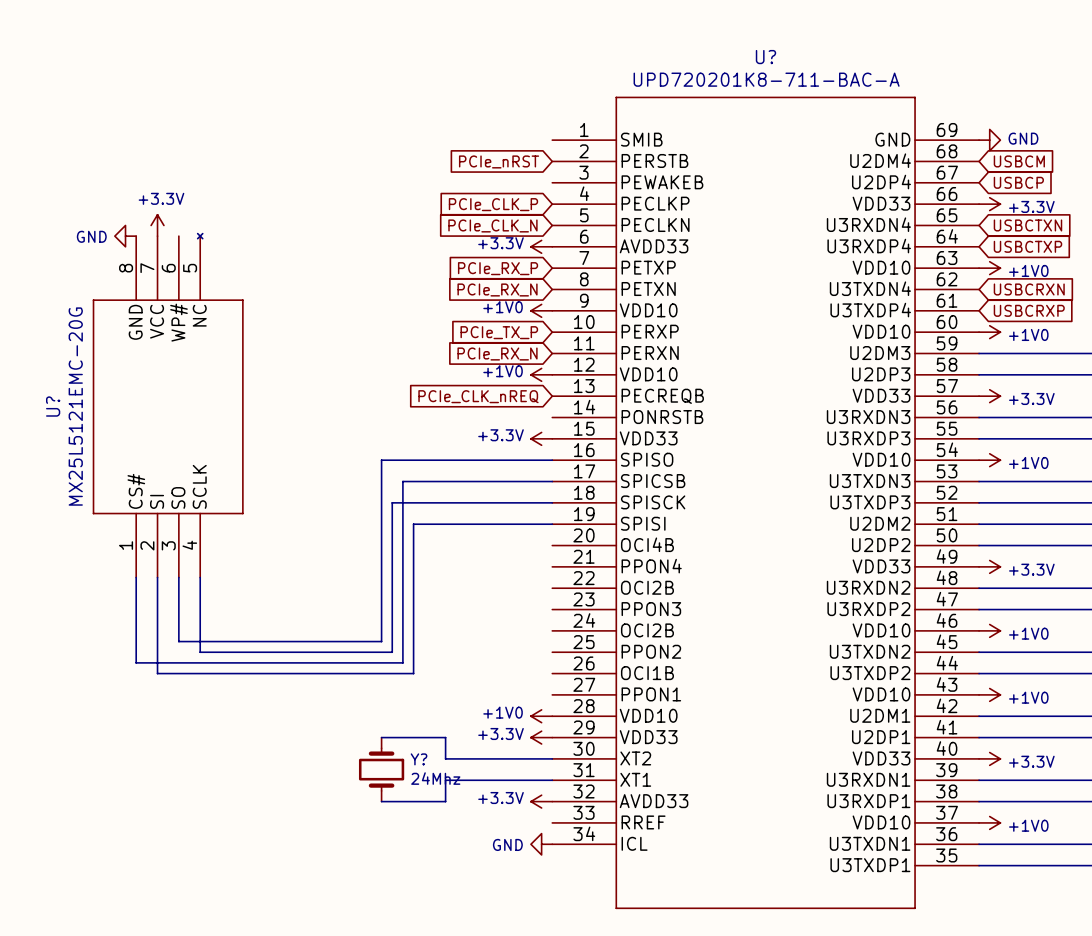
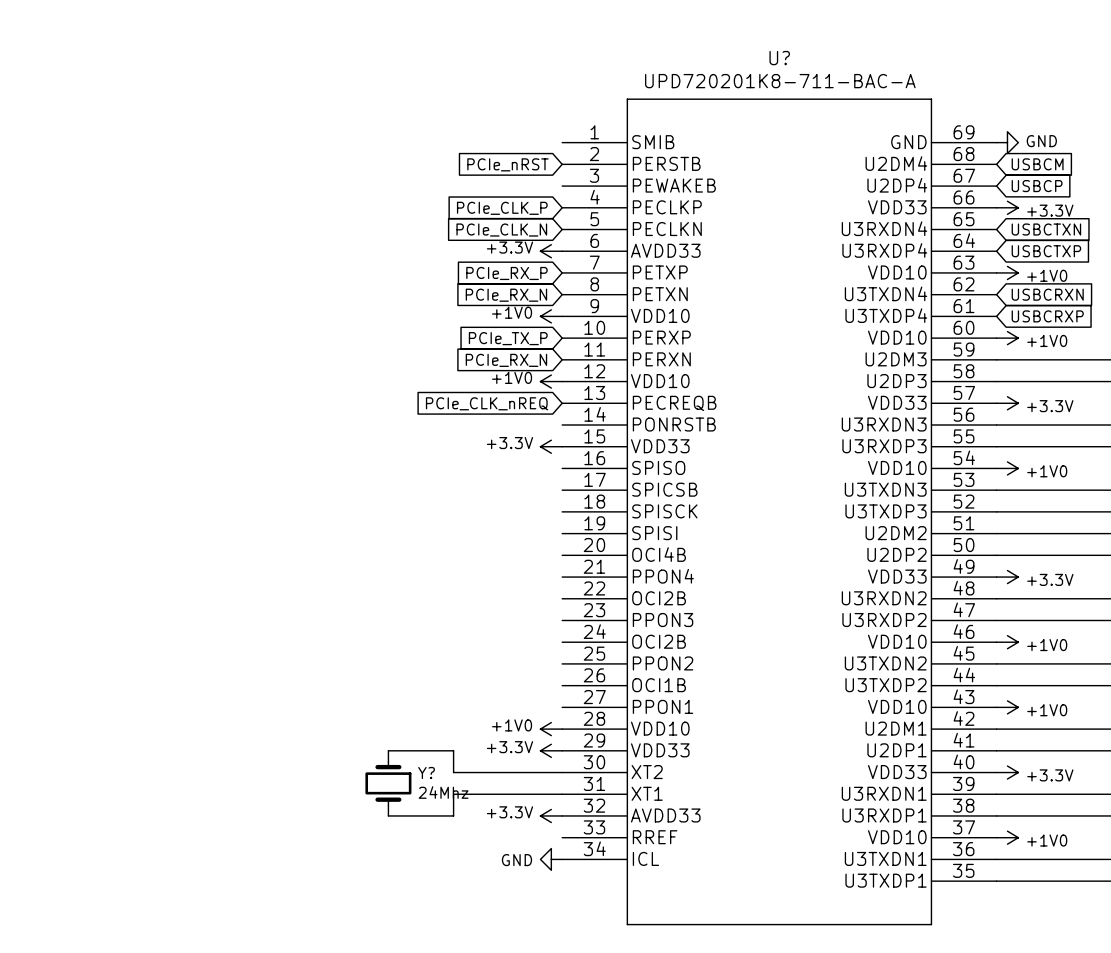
power symbol: +3.3V (157, 225) -> none
power symbol: GND (125, 236) -> none
U?: MX25L5121EMC-20G (168, 405) -> none
wire: (552, 460) (381, 460) (381, 641) (178, 641) (178, 577) -> none
wire: (552, 481) (402, 481) (402, 662) (136, 662) (136, 577) -> none
wire: (552, 502) (392, 502) (392, 652) (200, 652) (200, 577) -> none
wire: (552, 524) (413, 524) (413, 673) (157, 673) (157, 577) -> none

